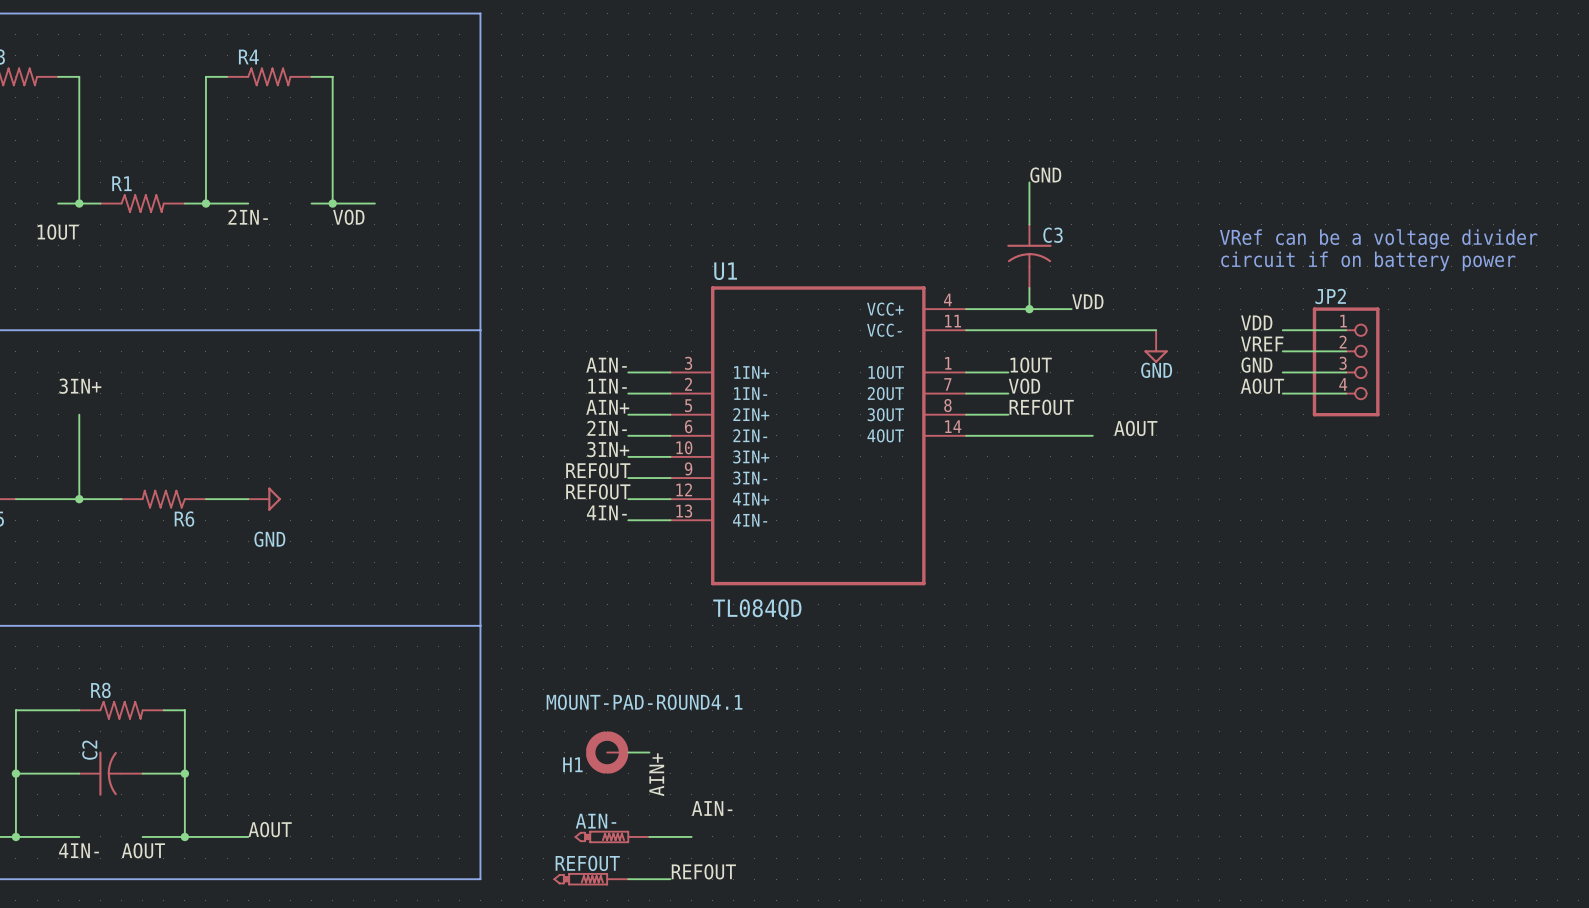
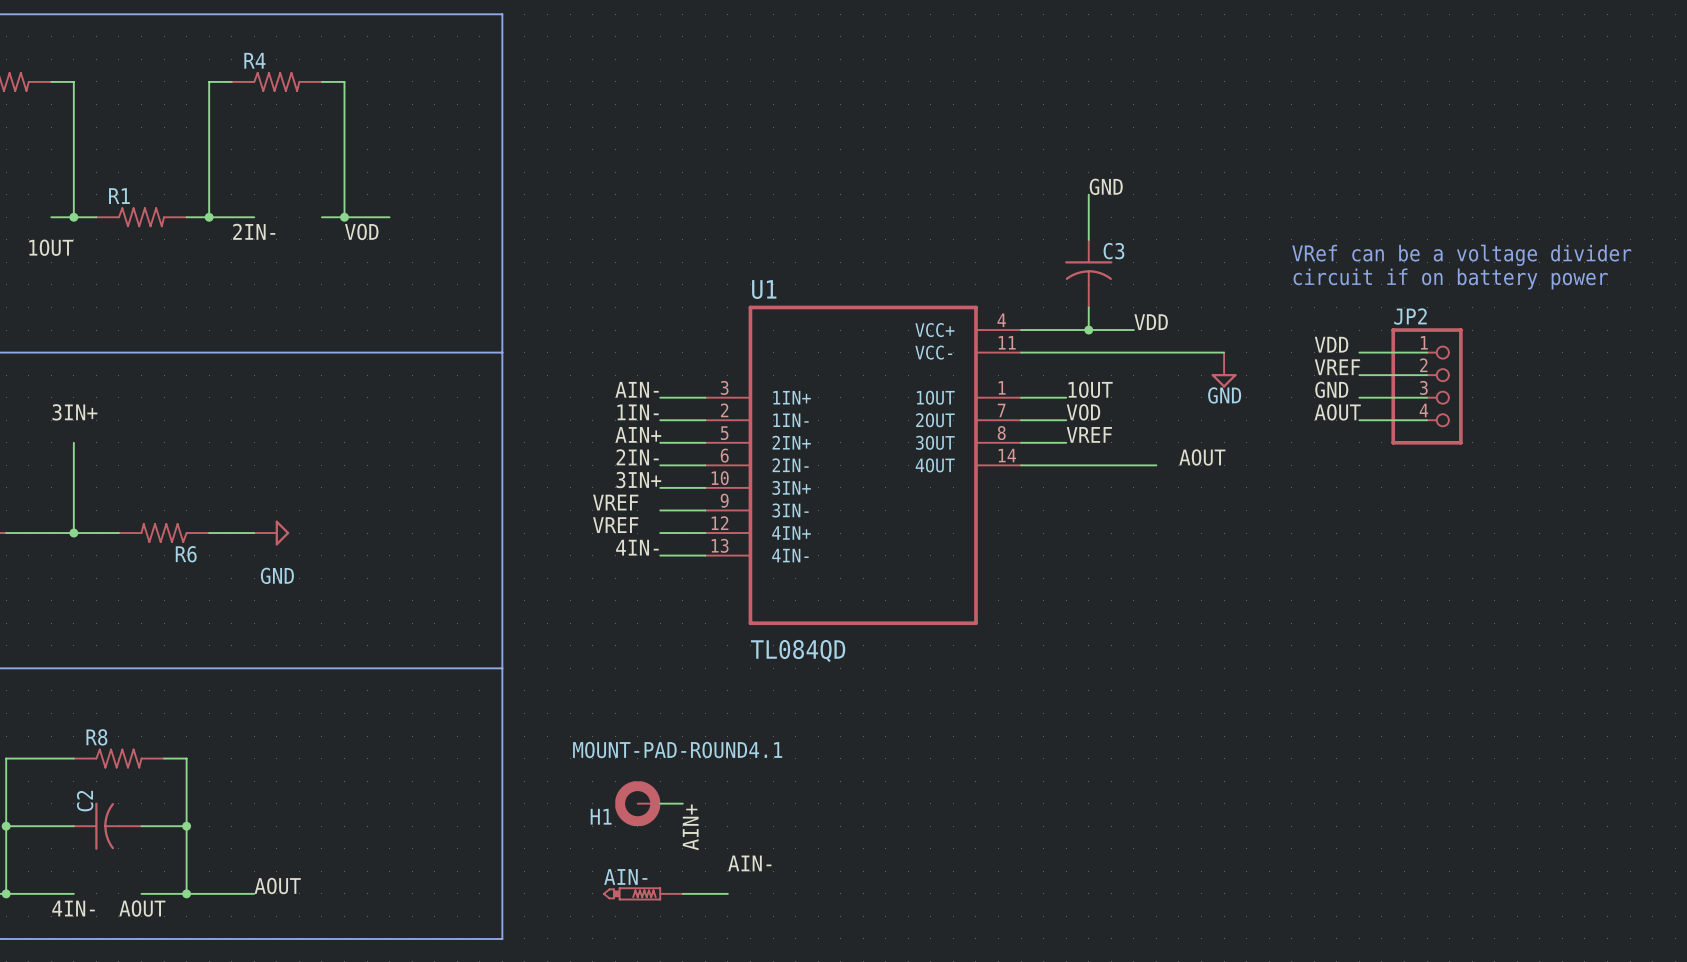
label: REFOUT (1041, 407) -> VREF (1089, 434)
label: REFOUT (598, 470) -> VREF (615, 502)
label: REFOUT (598, 491) -> VREF (615, 525)
label: REFOUT (703, 871) -> none
REFOUT: (591, 879) -> none
wire: (628, 879) (670, 879) -> none

